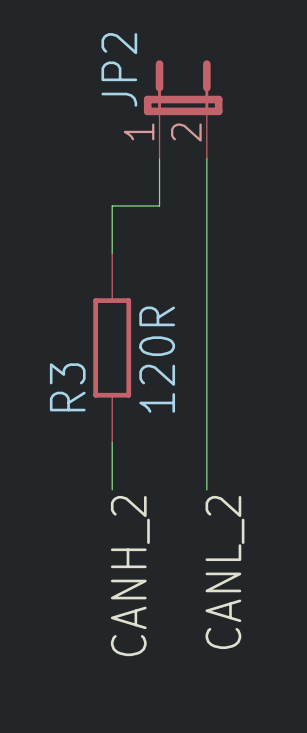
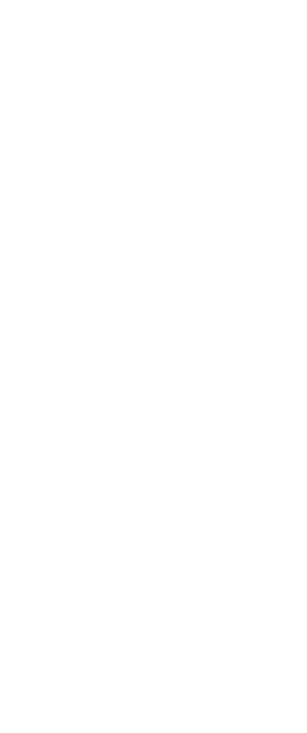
JP2: (183, 109) -> none
wire: (159, 158) (159, 206) (112, 206) (112, 253) -> none
wire: (206, 158) (206, 489) -> none
R3: 120R (112, 347) -> none
wire: (112, 442) (112, 489) -> none
label: CANL_2 (224, 572) -> none
label: CANH_2 (130, 576) -> none

